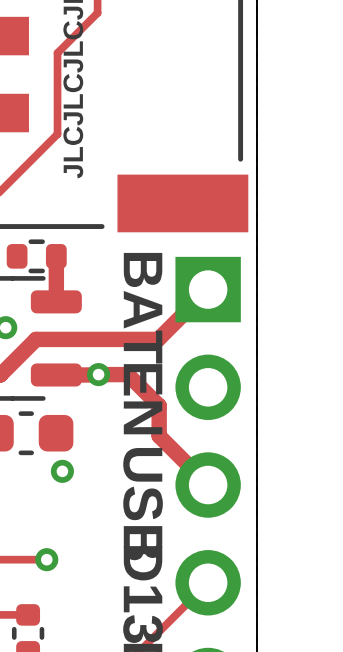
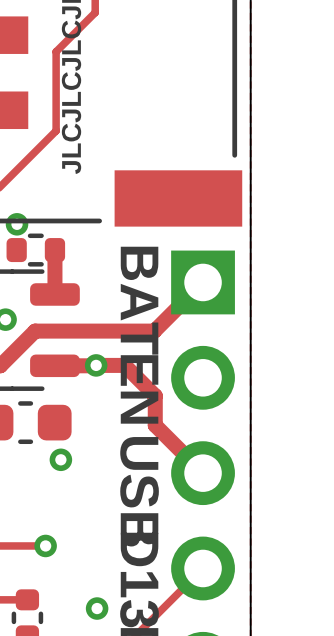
via: none -> (17, 224)
via: none -> (97, 608)

